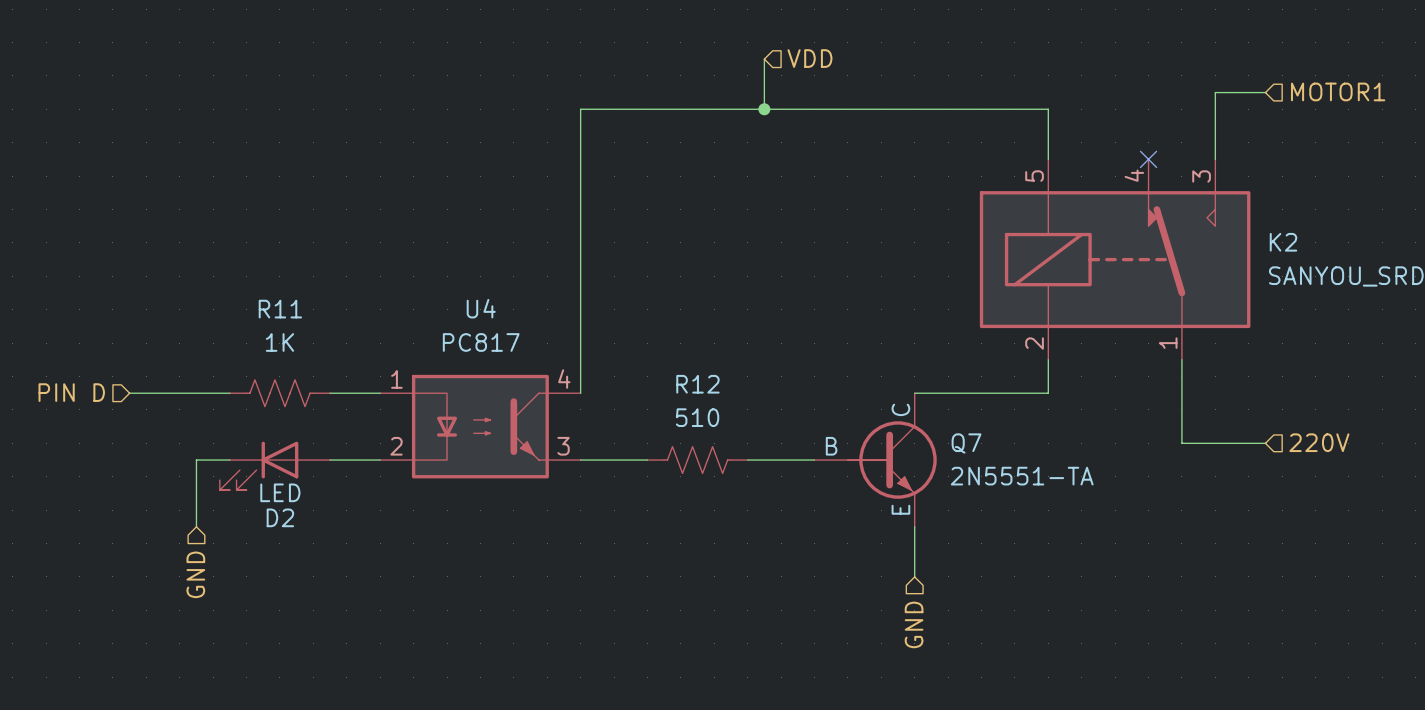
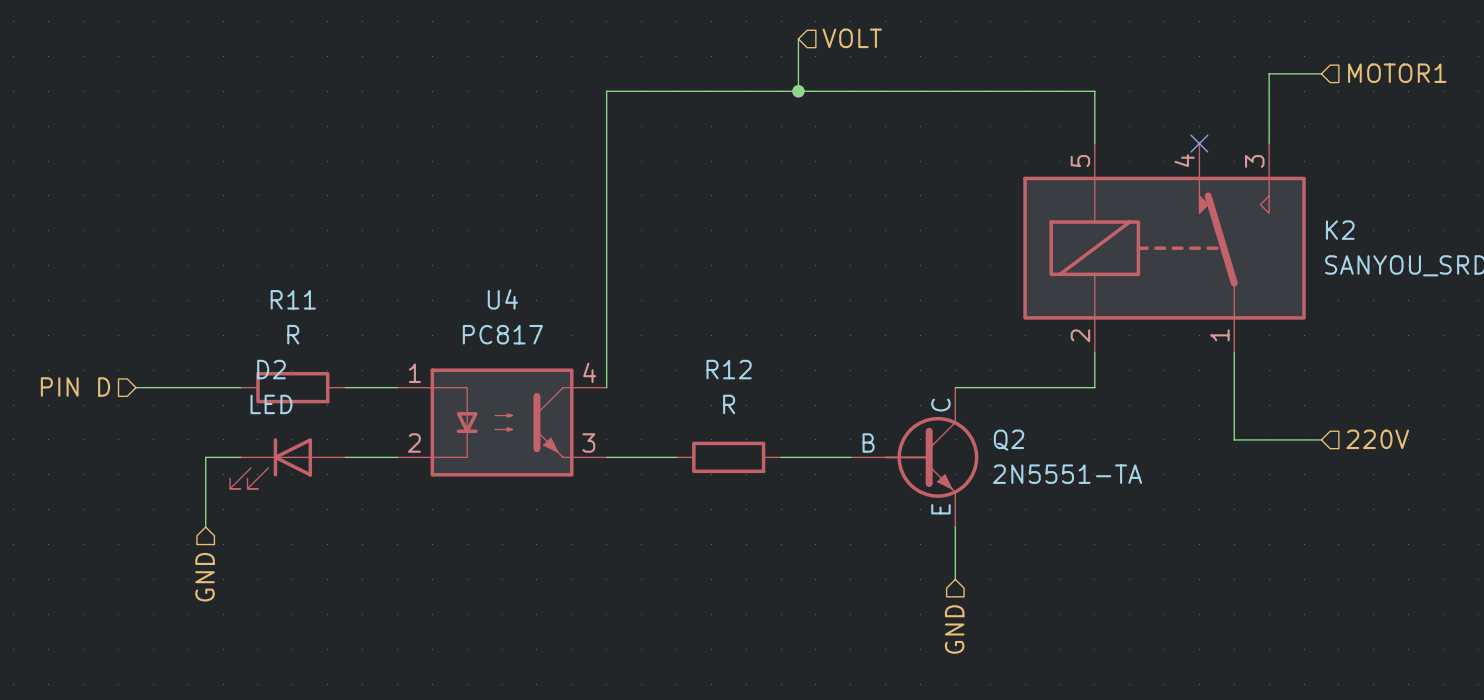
hierarchical label: VDD (809, 58) -> VOLT (852, 38)
R11 value: 1K (279, 342) -> R (293, 334)
R11 symbol: [229, 379, 331, 407] -> [240, 371, 346, 404]
R12 value: 510 (697, 417) -> R (729, 404)
Q7 name: Q7 (966, 443) -> Q2 (1009, 440)
R12 symbol: [647, 446, 748, 474] -> [676, 441, 782, 474]
D2 value position: LED (280, 492) -> LED (271, 404)
D2 name position: D2 (280, 517) -> D2 (271, 369)

